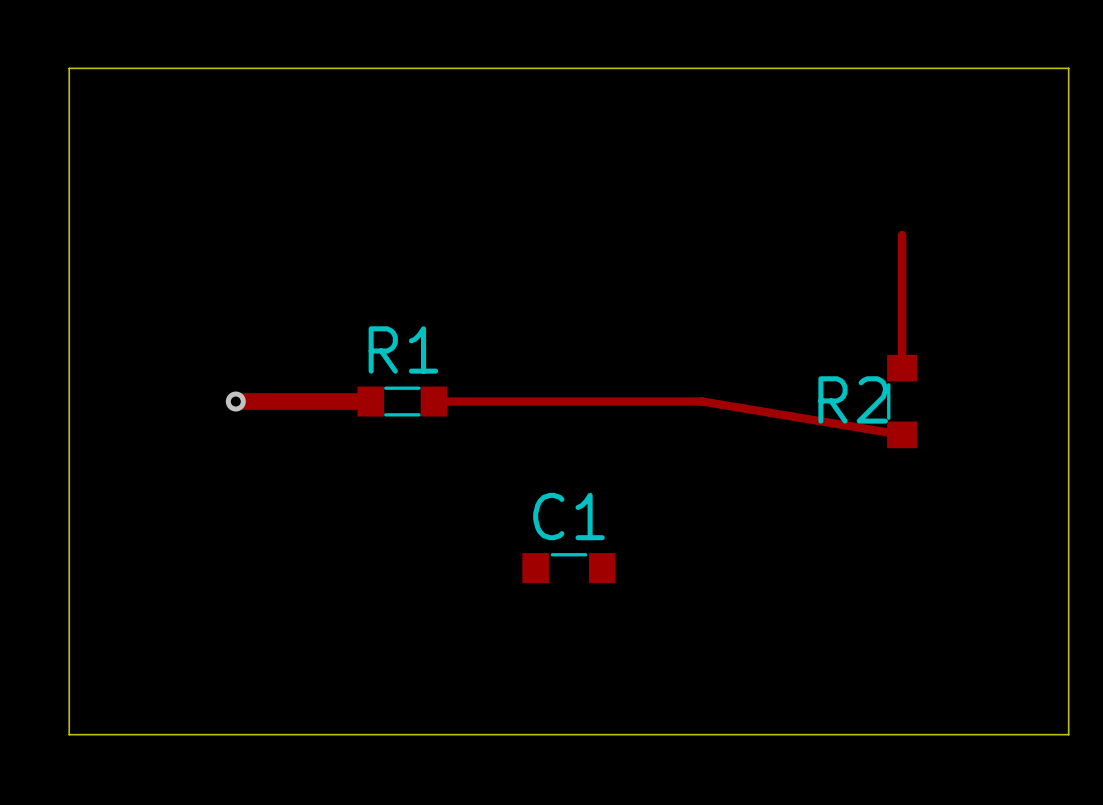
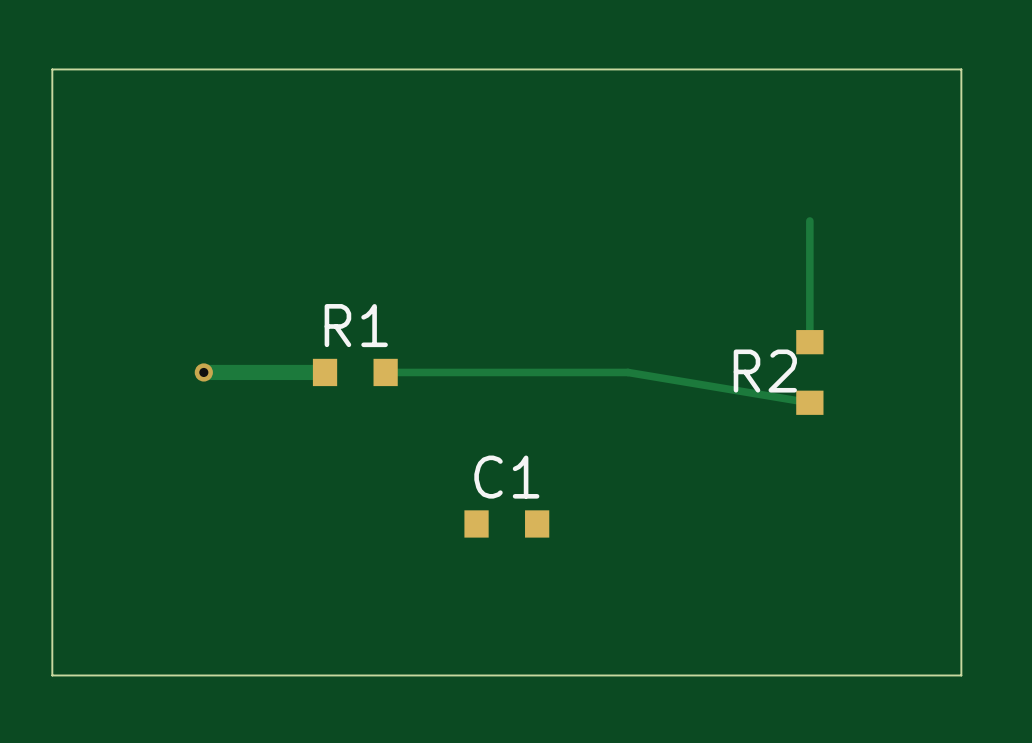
R2 footprint: [887, 354, 918, 449] -> [796, 330, 824, 415]
R1 footprint: [357, 386, 448, 417] -> [312, 358, 398, 387]
C1 footprint: [522, 553, 616, 584] -> [464, 510, 550, 538]

